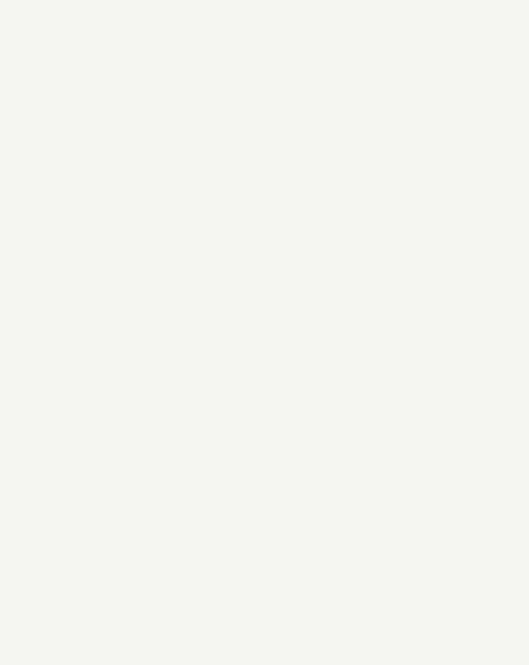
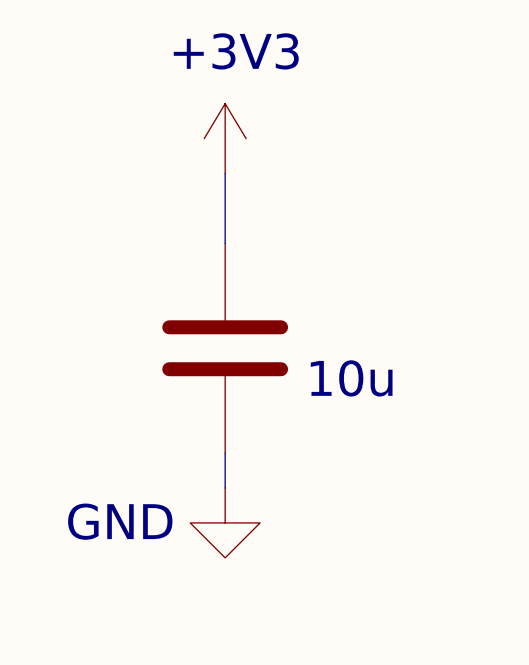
power symbol: none -> +3V3 (225, 138)
wire: none -> (225, 173) (225, 243)
part: none -> 10u (225, 348)
wire: none -> (225, 453) (225, 488)
power symbol: none -> GND (225, 522)

